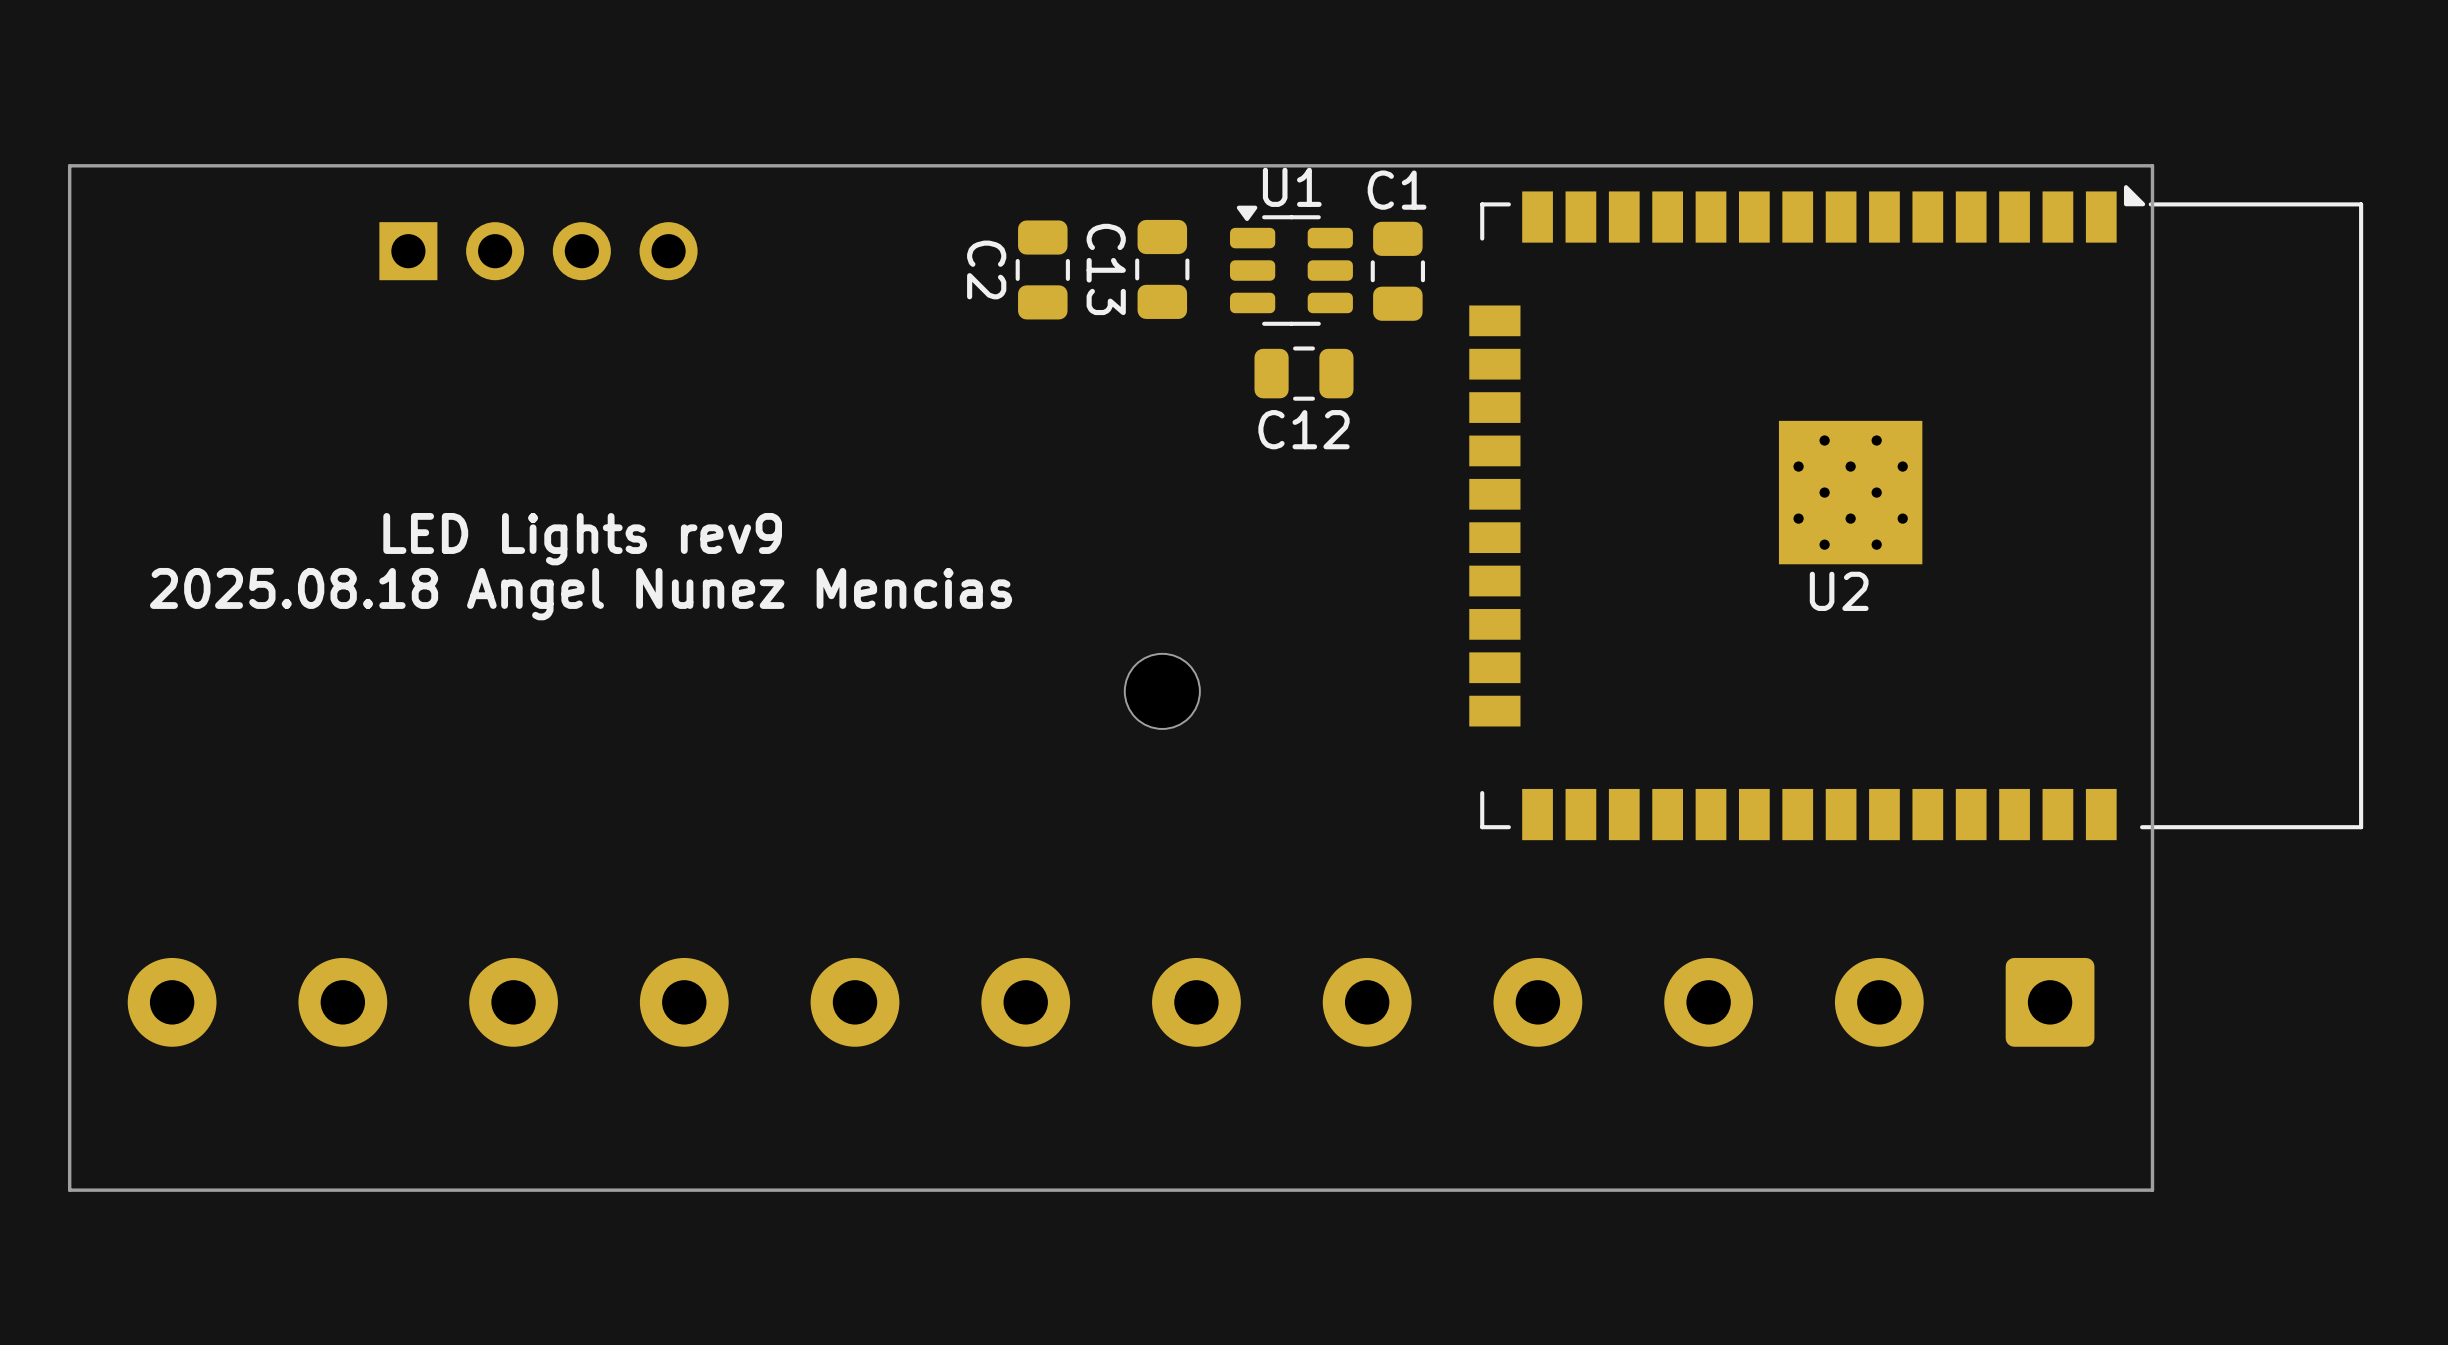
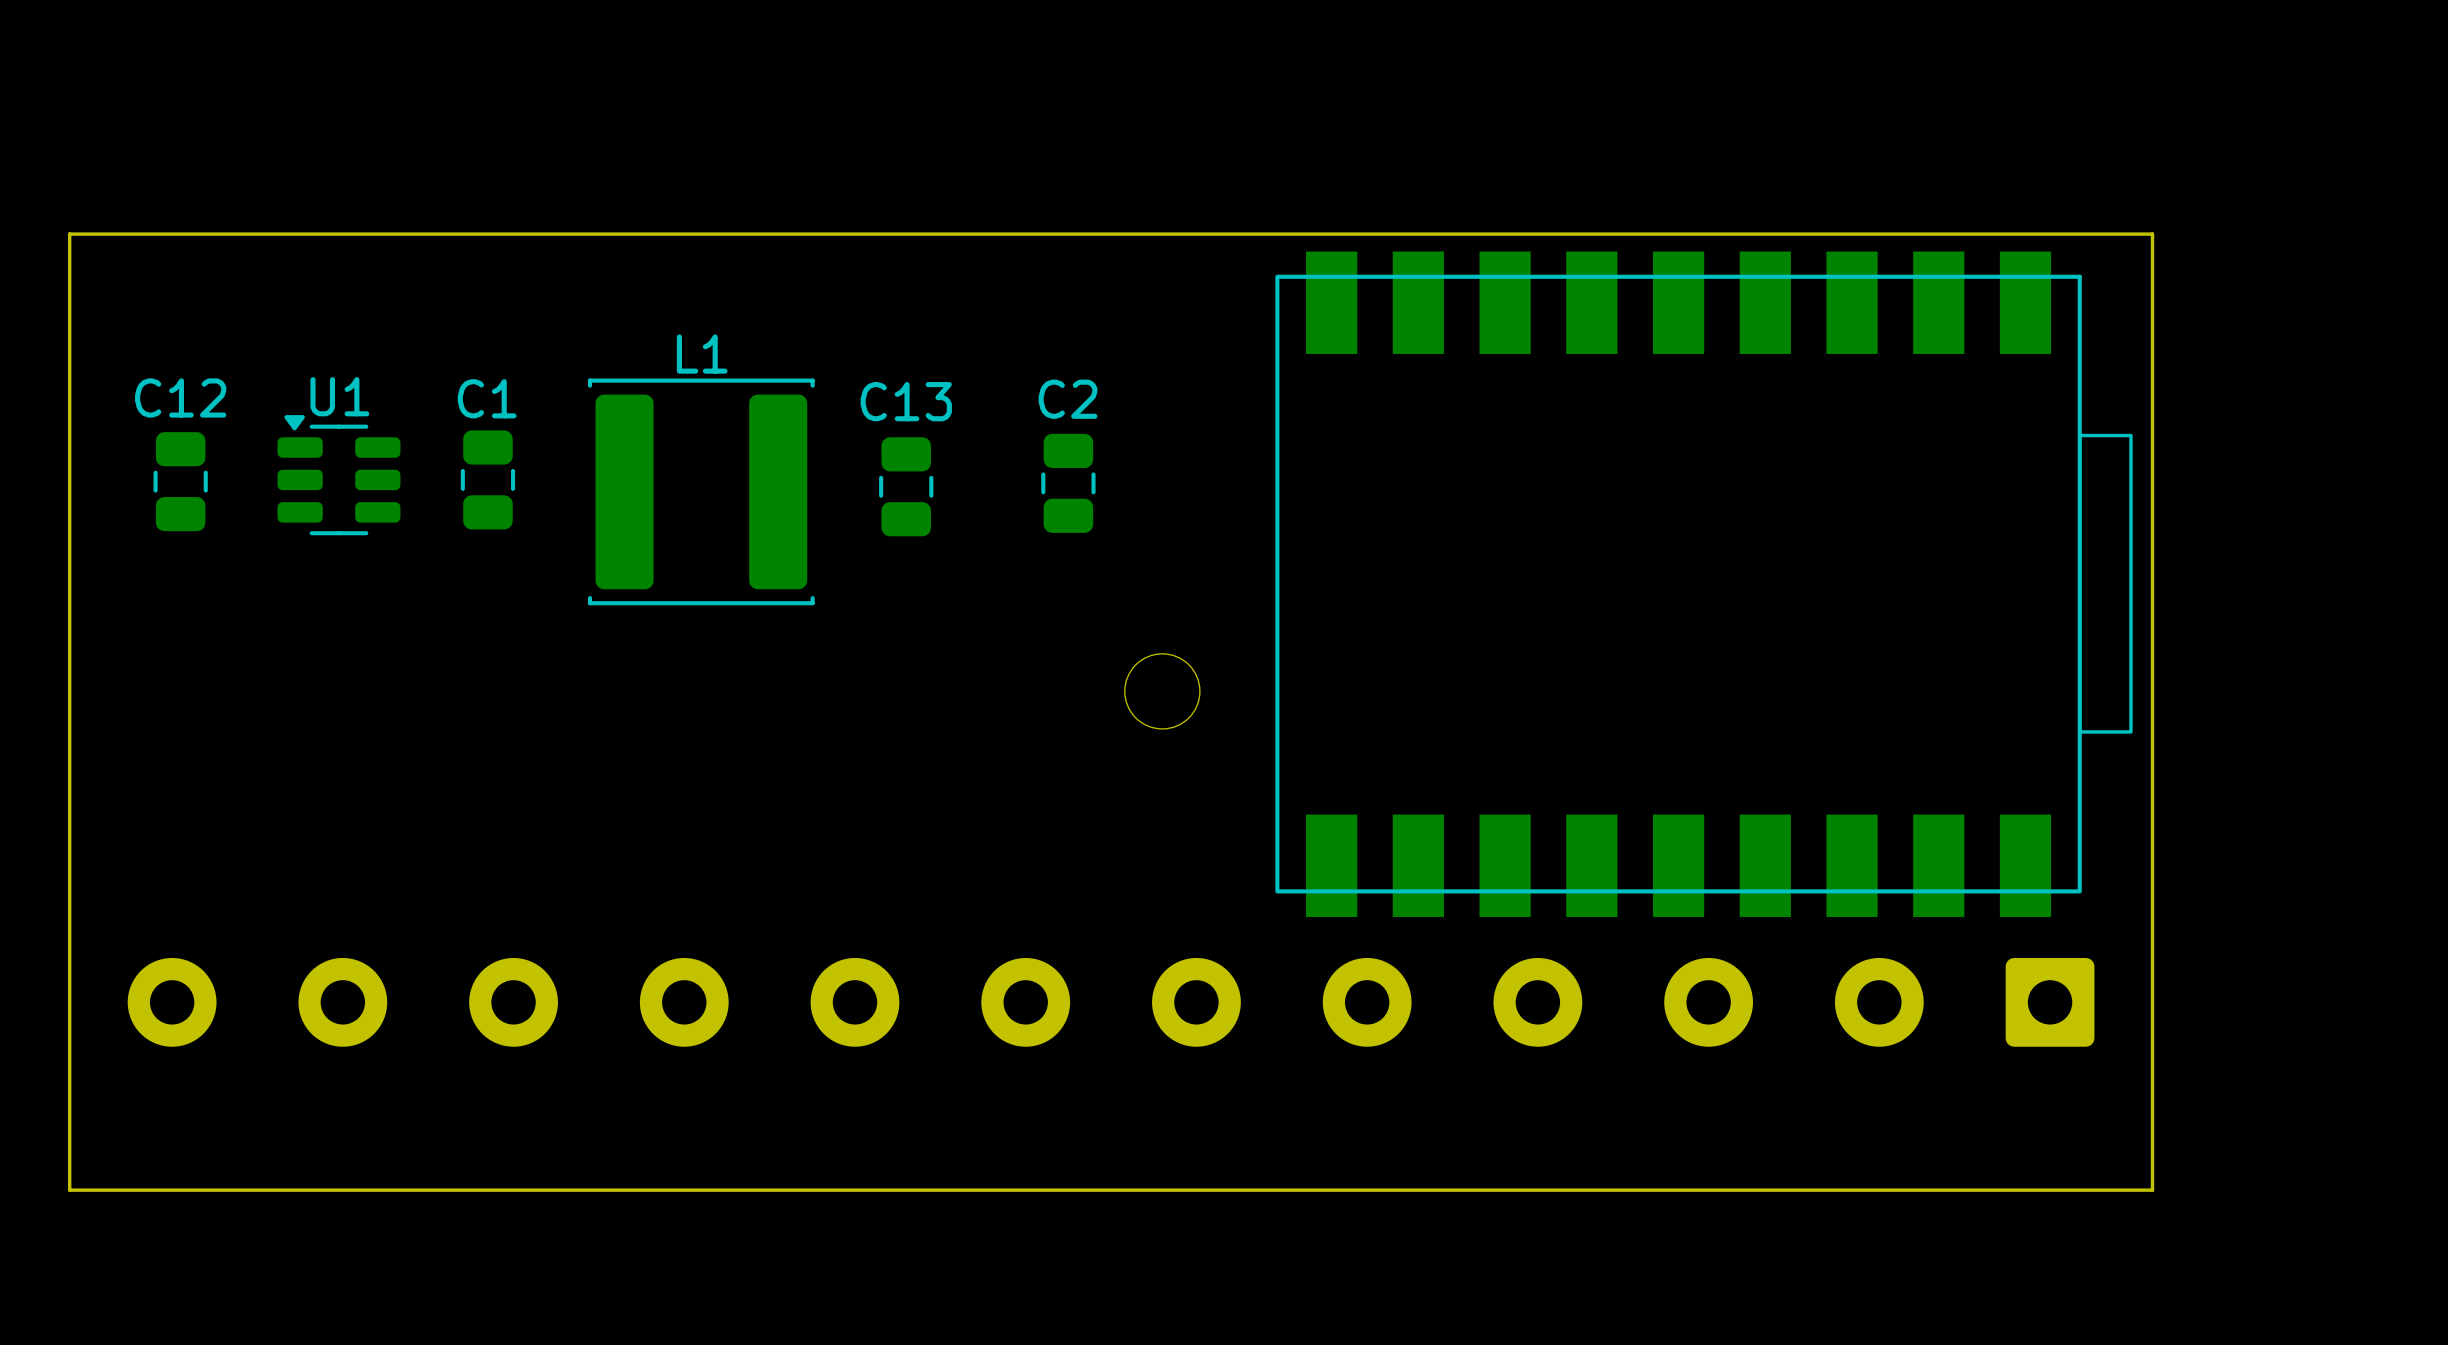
board edge: (2152, 234) (2152, 165) (69, 165) (69, 234) -> (2152, 234) (69, 234)
part: (538, 251) -> none
U1 position: (1291, 265) -> (338, 475)
C2 name rotation: 0° (986, 269) -> 90° counterclockwise (1067, 399)
C2 name position: C2 (986, 269) -> C2 (1067, 399)
C2 position: (1042, 269) -> (1068, 483)
C13 name rotation: 0° (1106, 269) -> 90° counterclockwise (906, 401)
C13 position: (1162, 269) -> (906, 486)
C1 position: (1397, 271) -> (487, 479)
C12 rotation: 0° (1304, 373) -> 90° clockwise (180, 481)
C12 position: (1304, 373) -> (180, 481)
C12 name position: C12 (1304, 429) -> C12 (180, 398)
L1: none -> (701, 491)
U2: (1916, 512) -> none
text: LED Lights rev9 (582, 539) -> none
part: none -> (1704, 584)
text: 2025.08.18 Angel Nunez Mencias (581, 594) -> none

